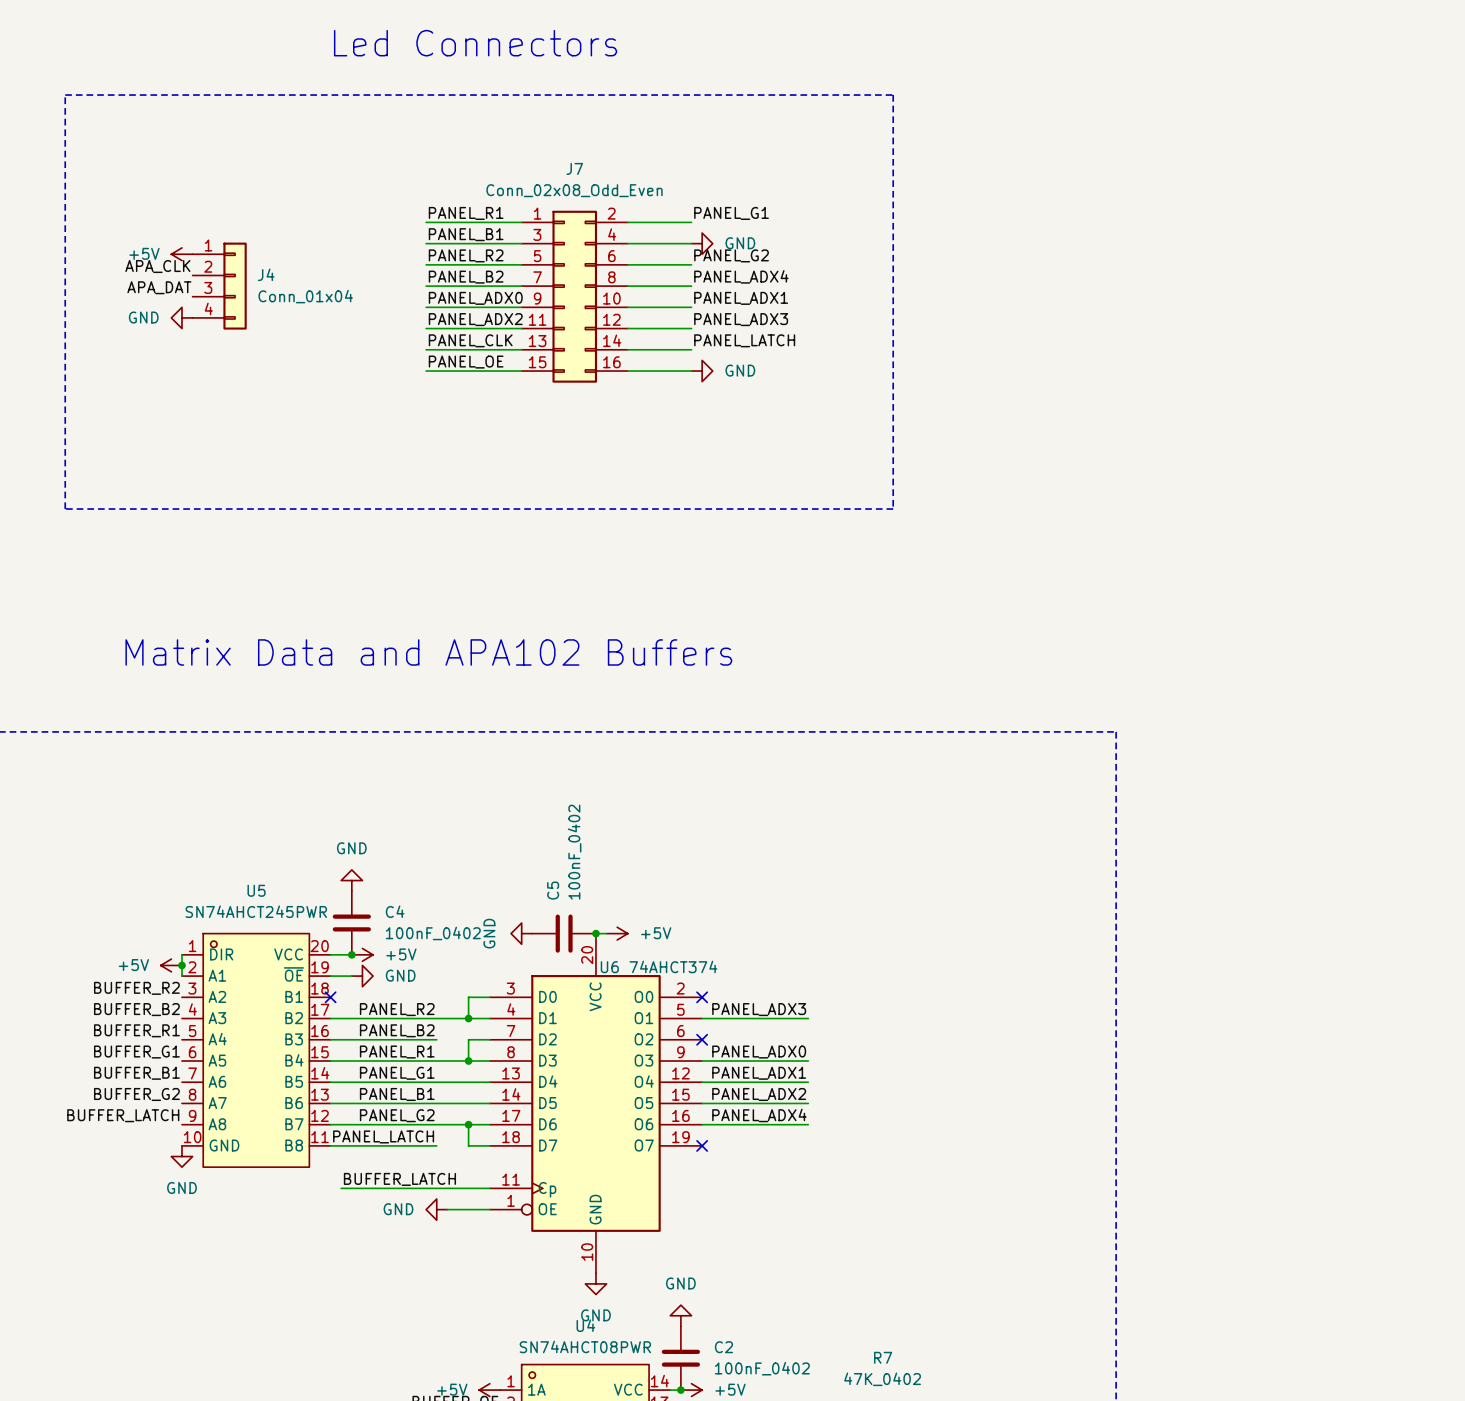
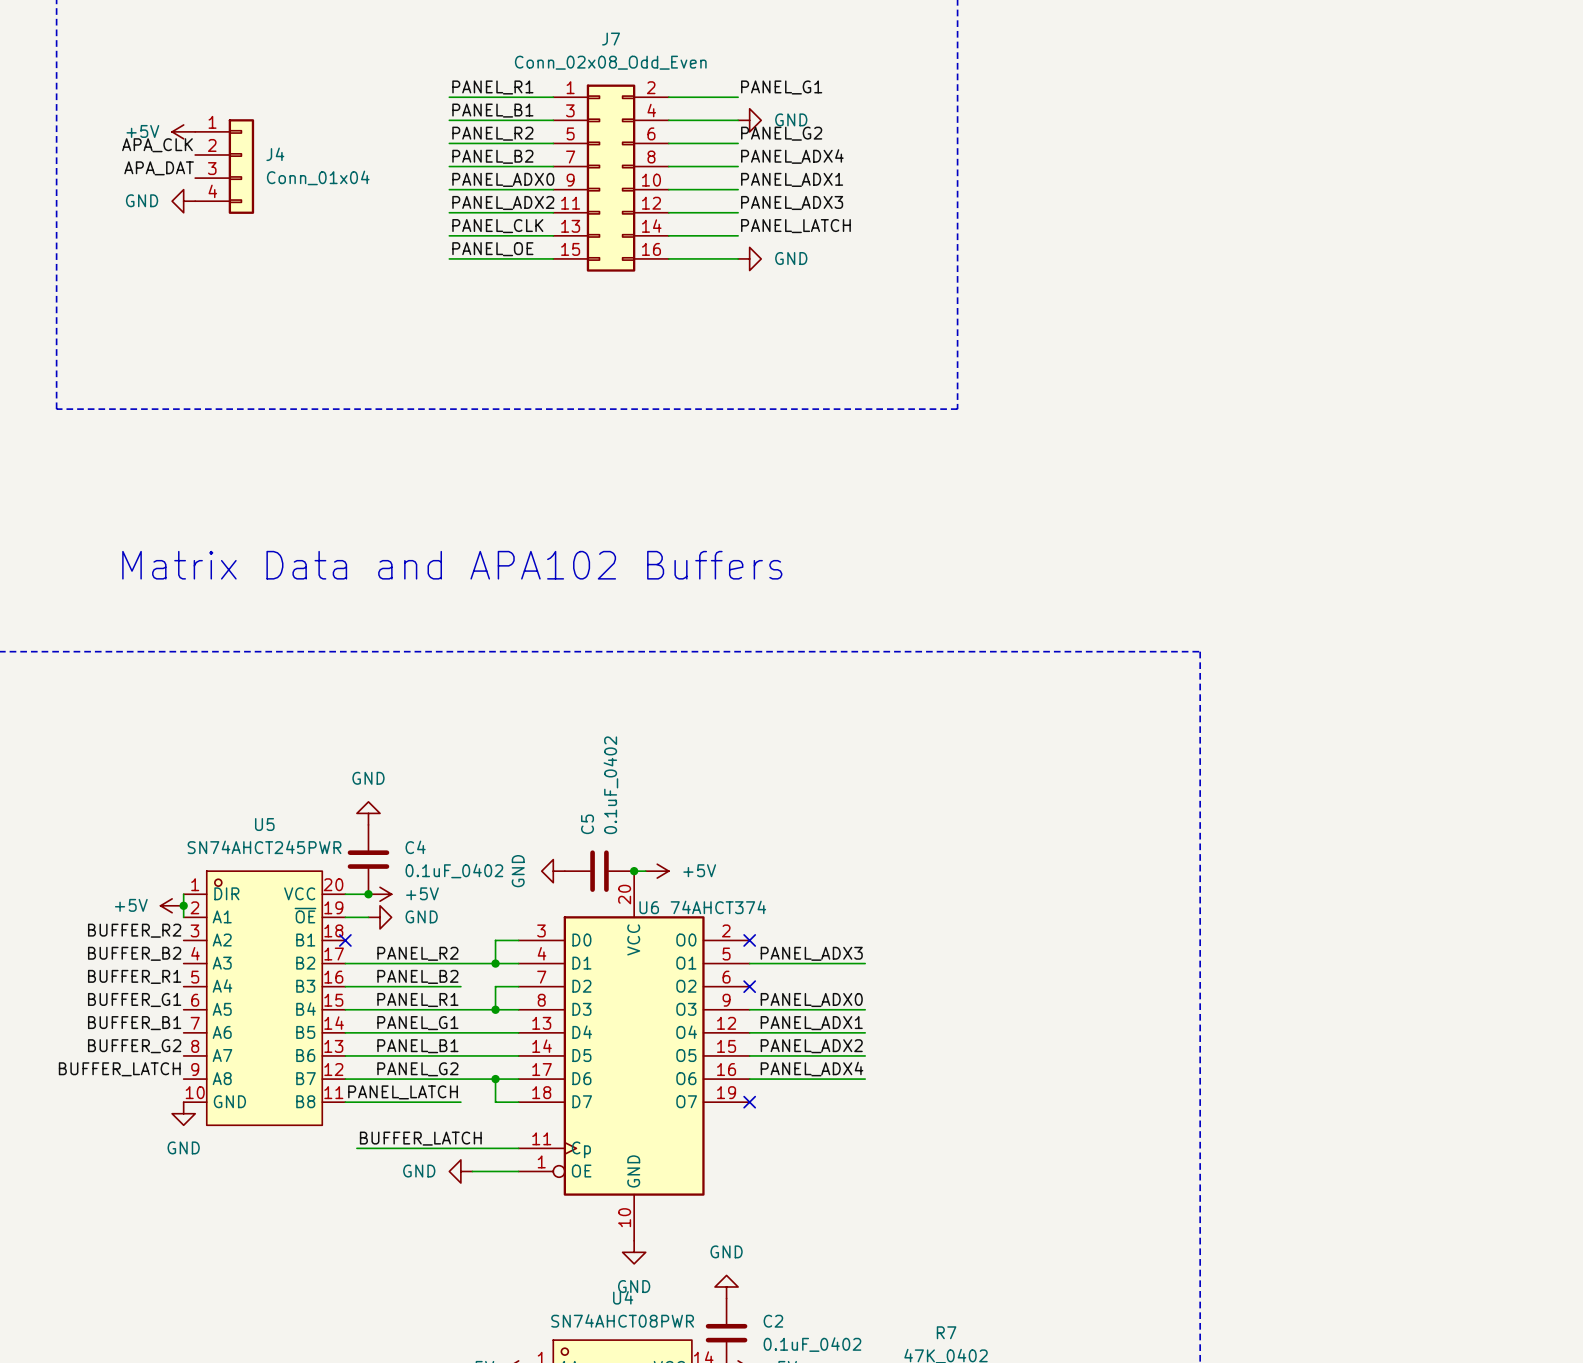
C5 value: 100nF_0402 (574, 852) -> 0.1uF_0402 (610, 785)
C4 value: 100nF_0402 (433, 933) -> 0.1uF_0402 (454, 870)
C2 value: 100nF_0402 (762, 1368) -> 0.1uF_0402 (812, 1344)

